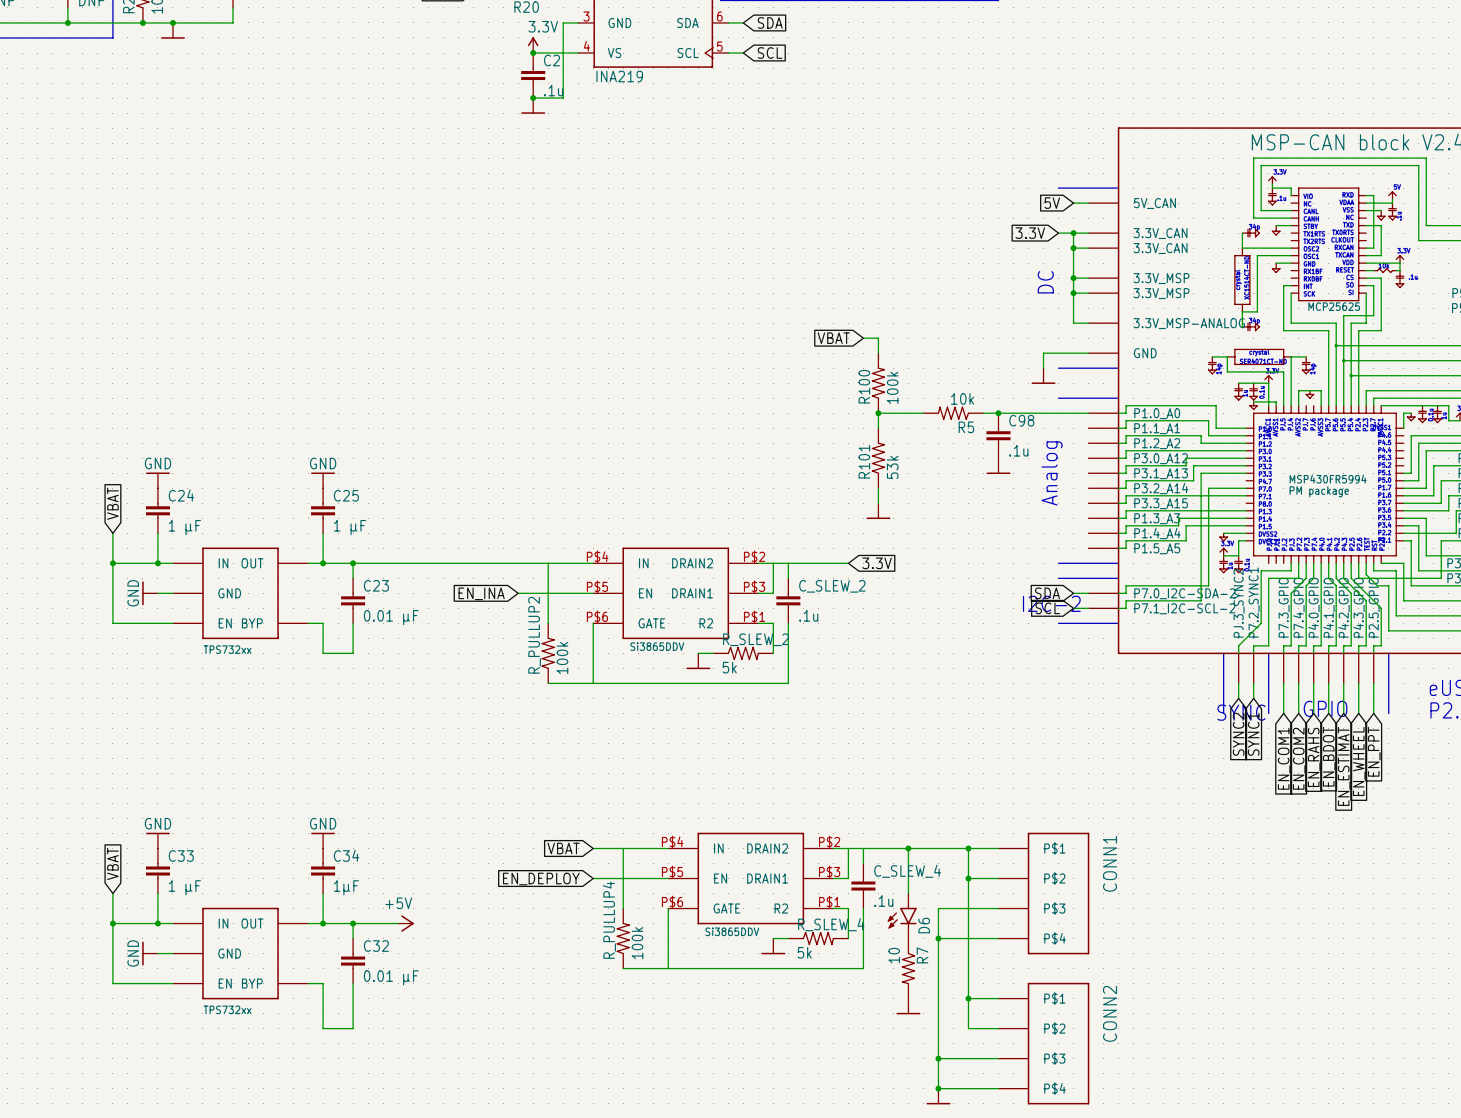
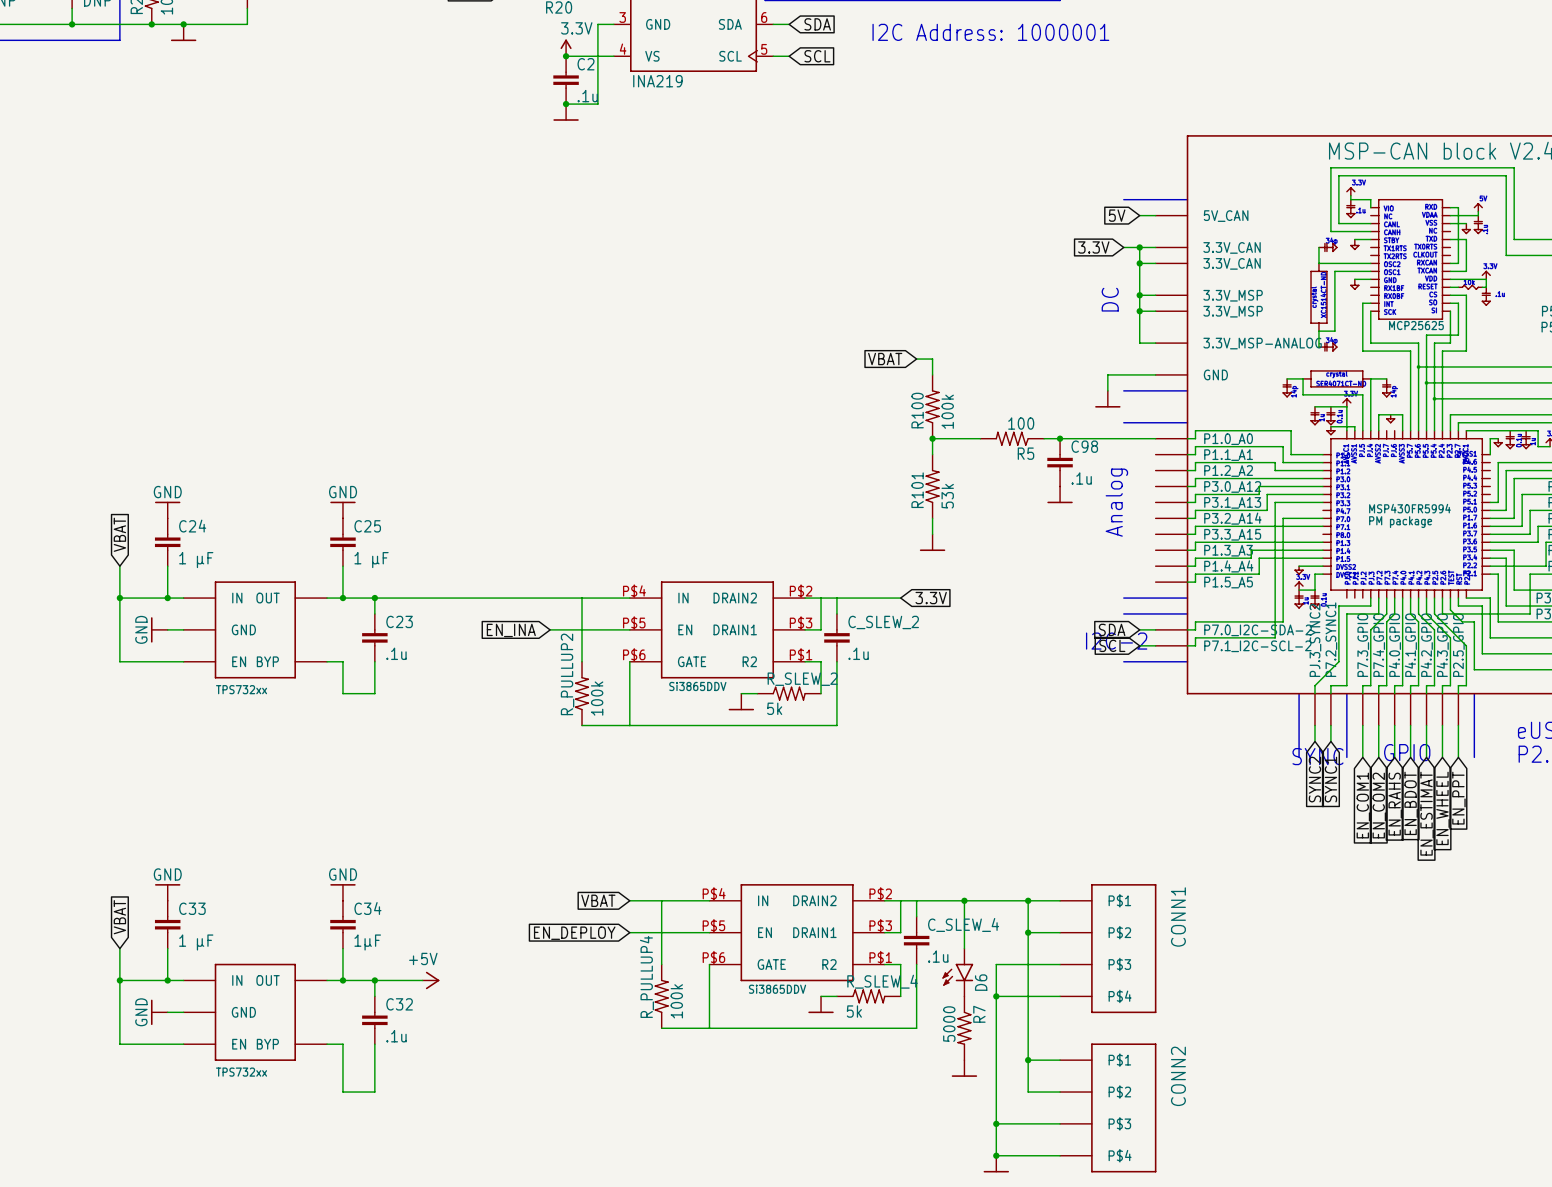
text: none -> I2C Address: 1000001 (990, 32)
R5 value: 10k (962, 398) -> 100 (1021, 423)
C23 value: 0.01 μF (391, 617) -> .1u (396, 653)
R7 value: 10 (894, 955) -> 5000 (949, 1024)
C32 value: 0.01 μF (391, 977) -> .1u (396, 1036)

